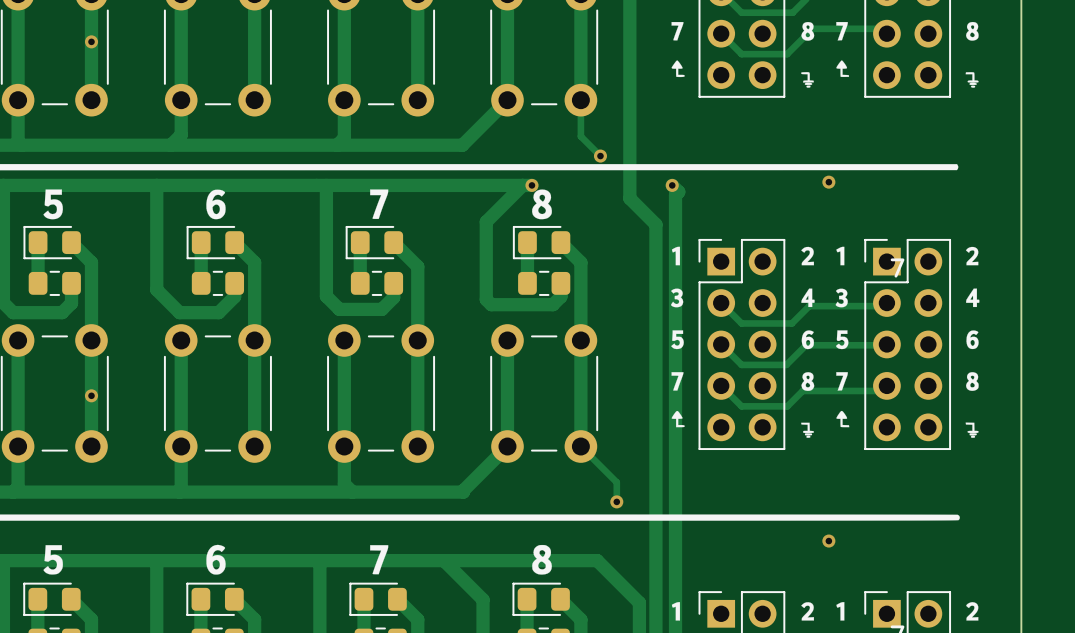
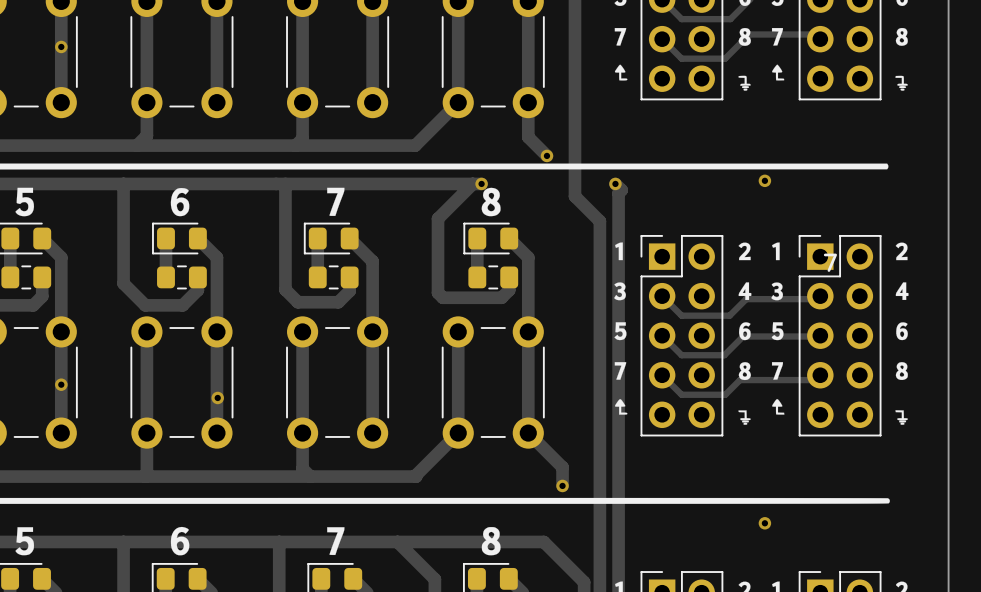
track width: thin (580, 100) (580, 136) (600, 156) -> thick (528, 102) (528, 137) (546, 155)
via: none -> (217, 397)
track width: thin (580, 446) (616, 482) (616, 501) -> thick (528, 433) (562, 467) (562, 485)

